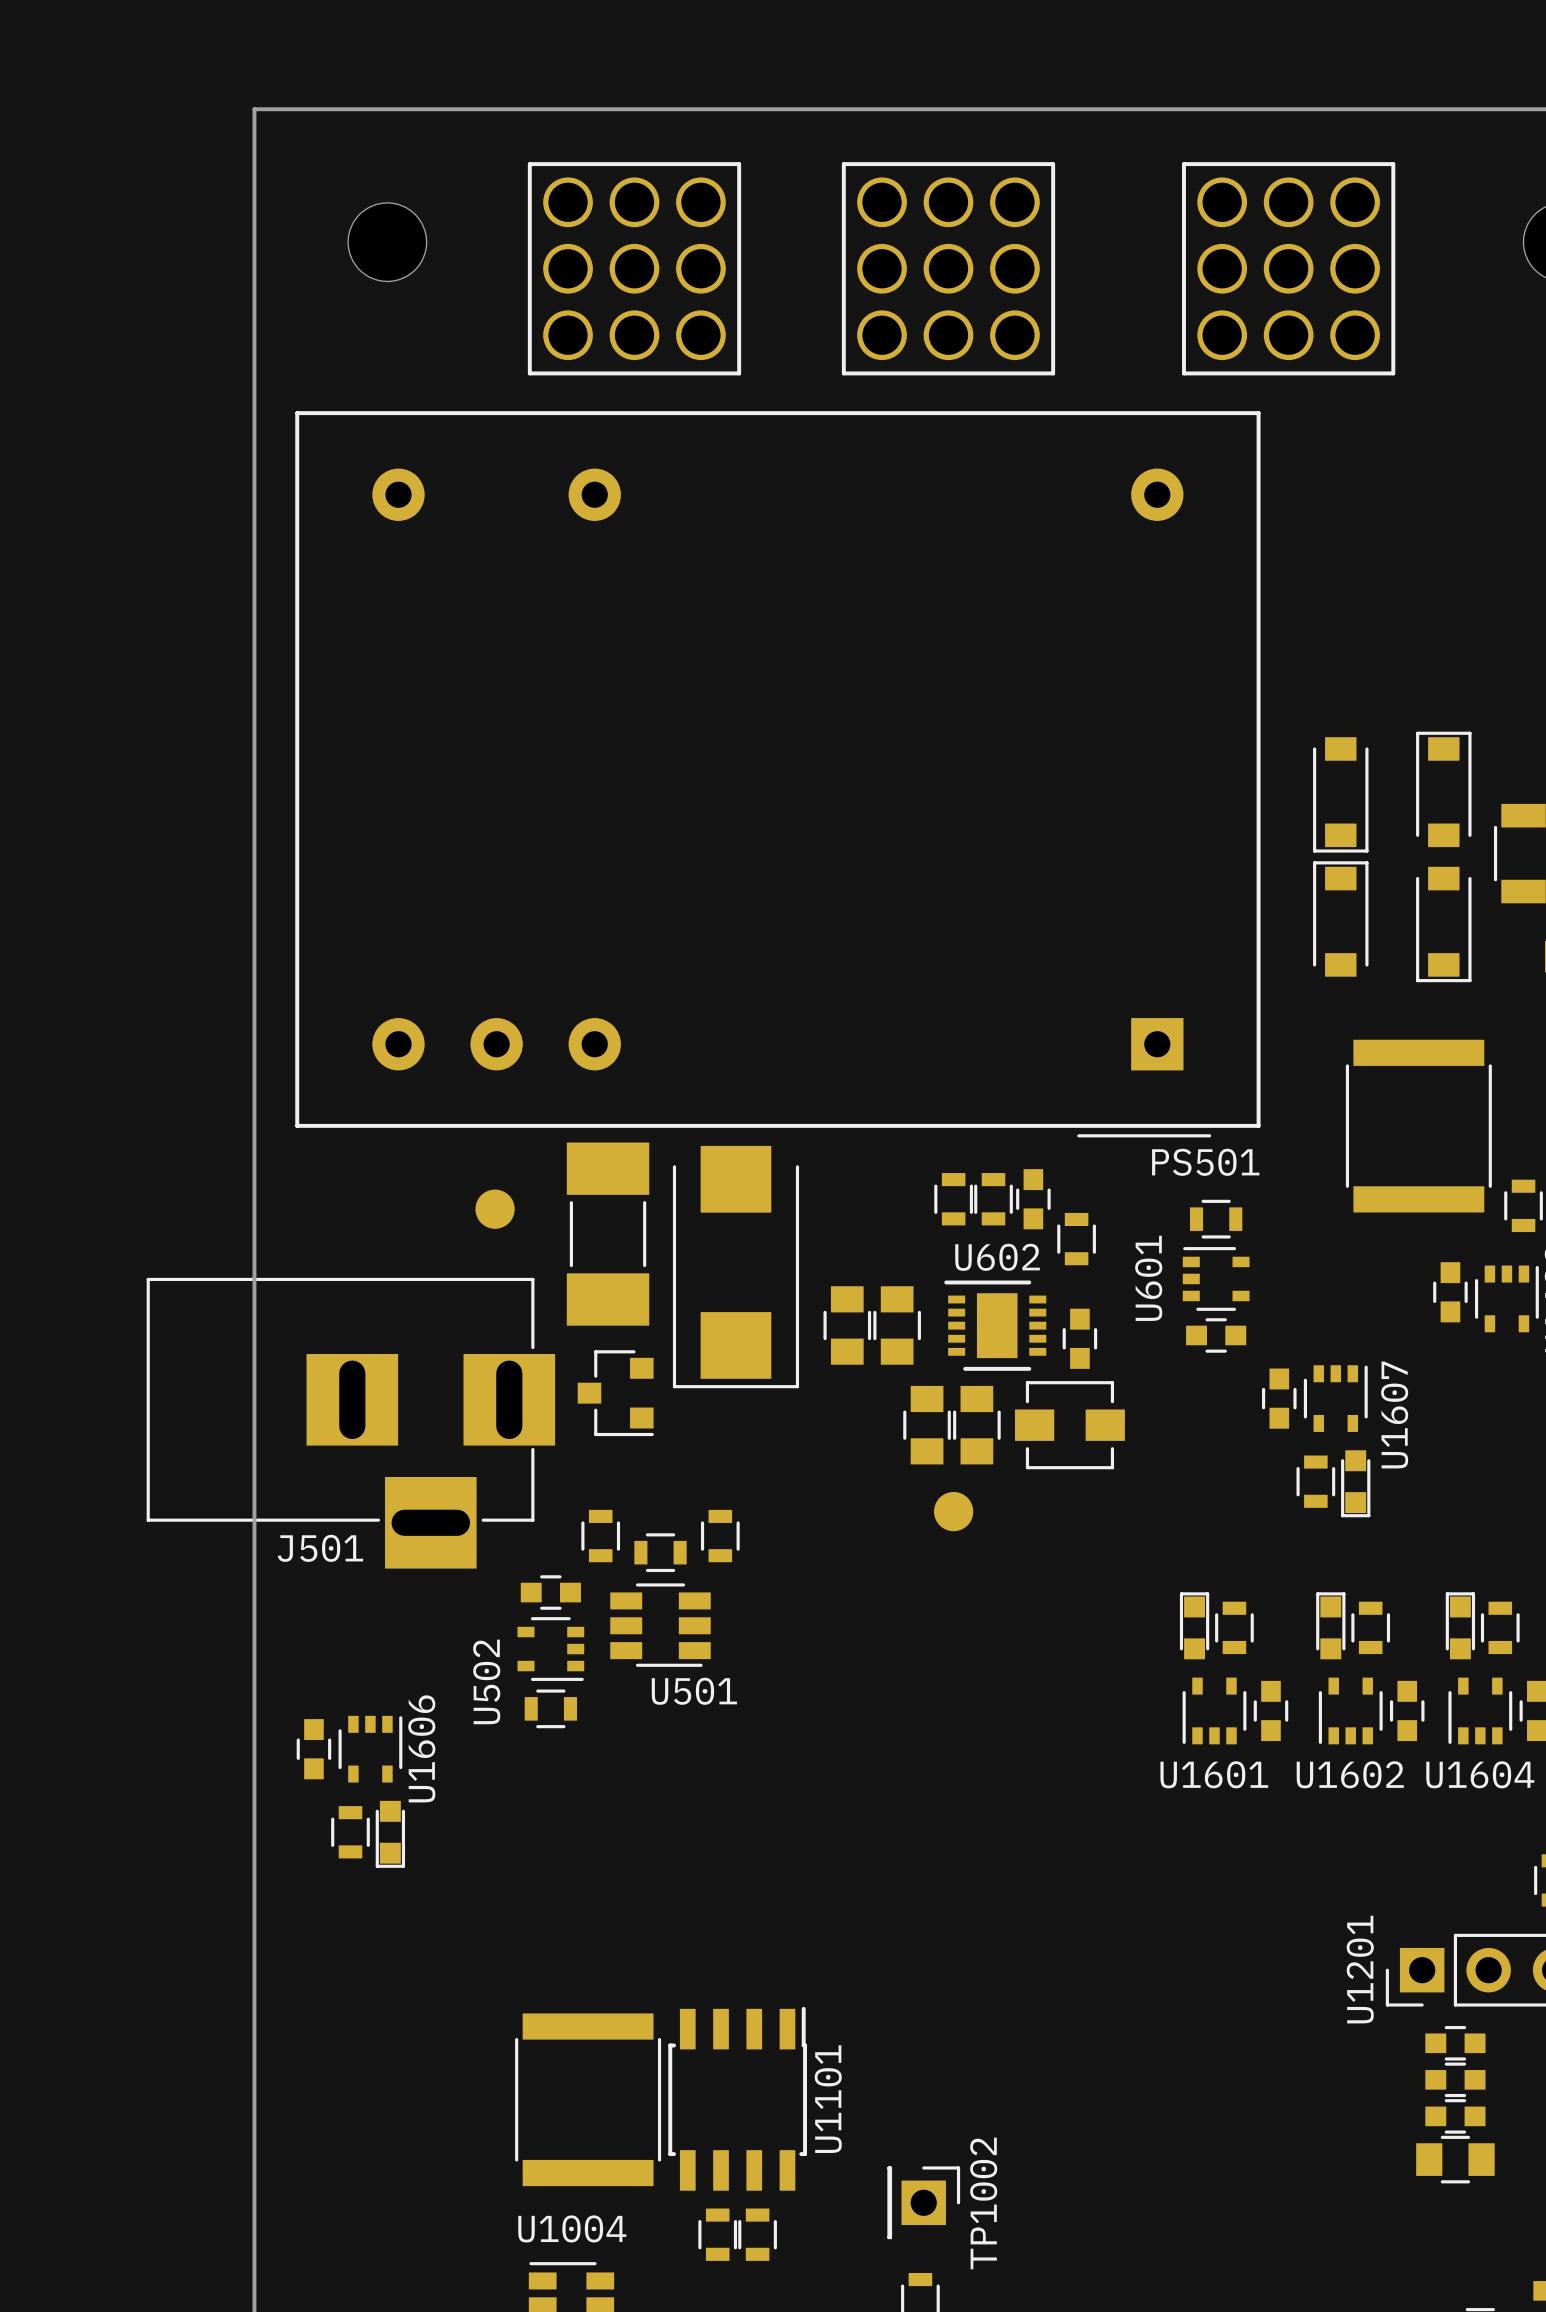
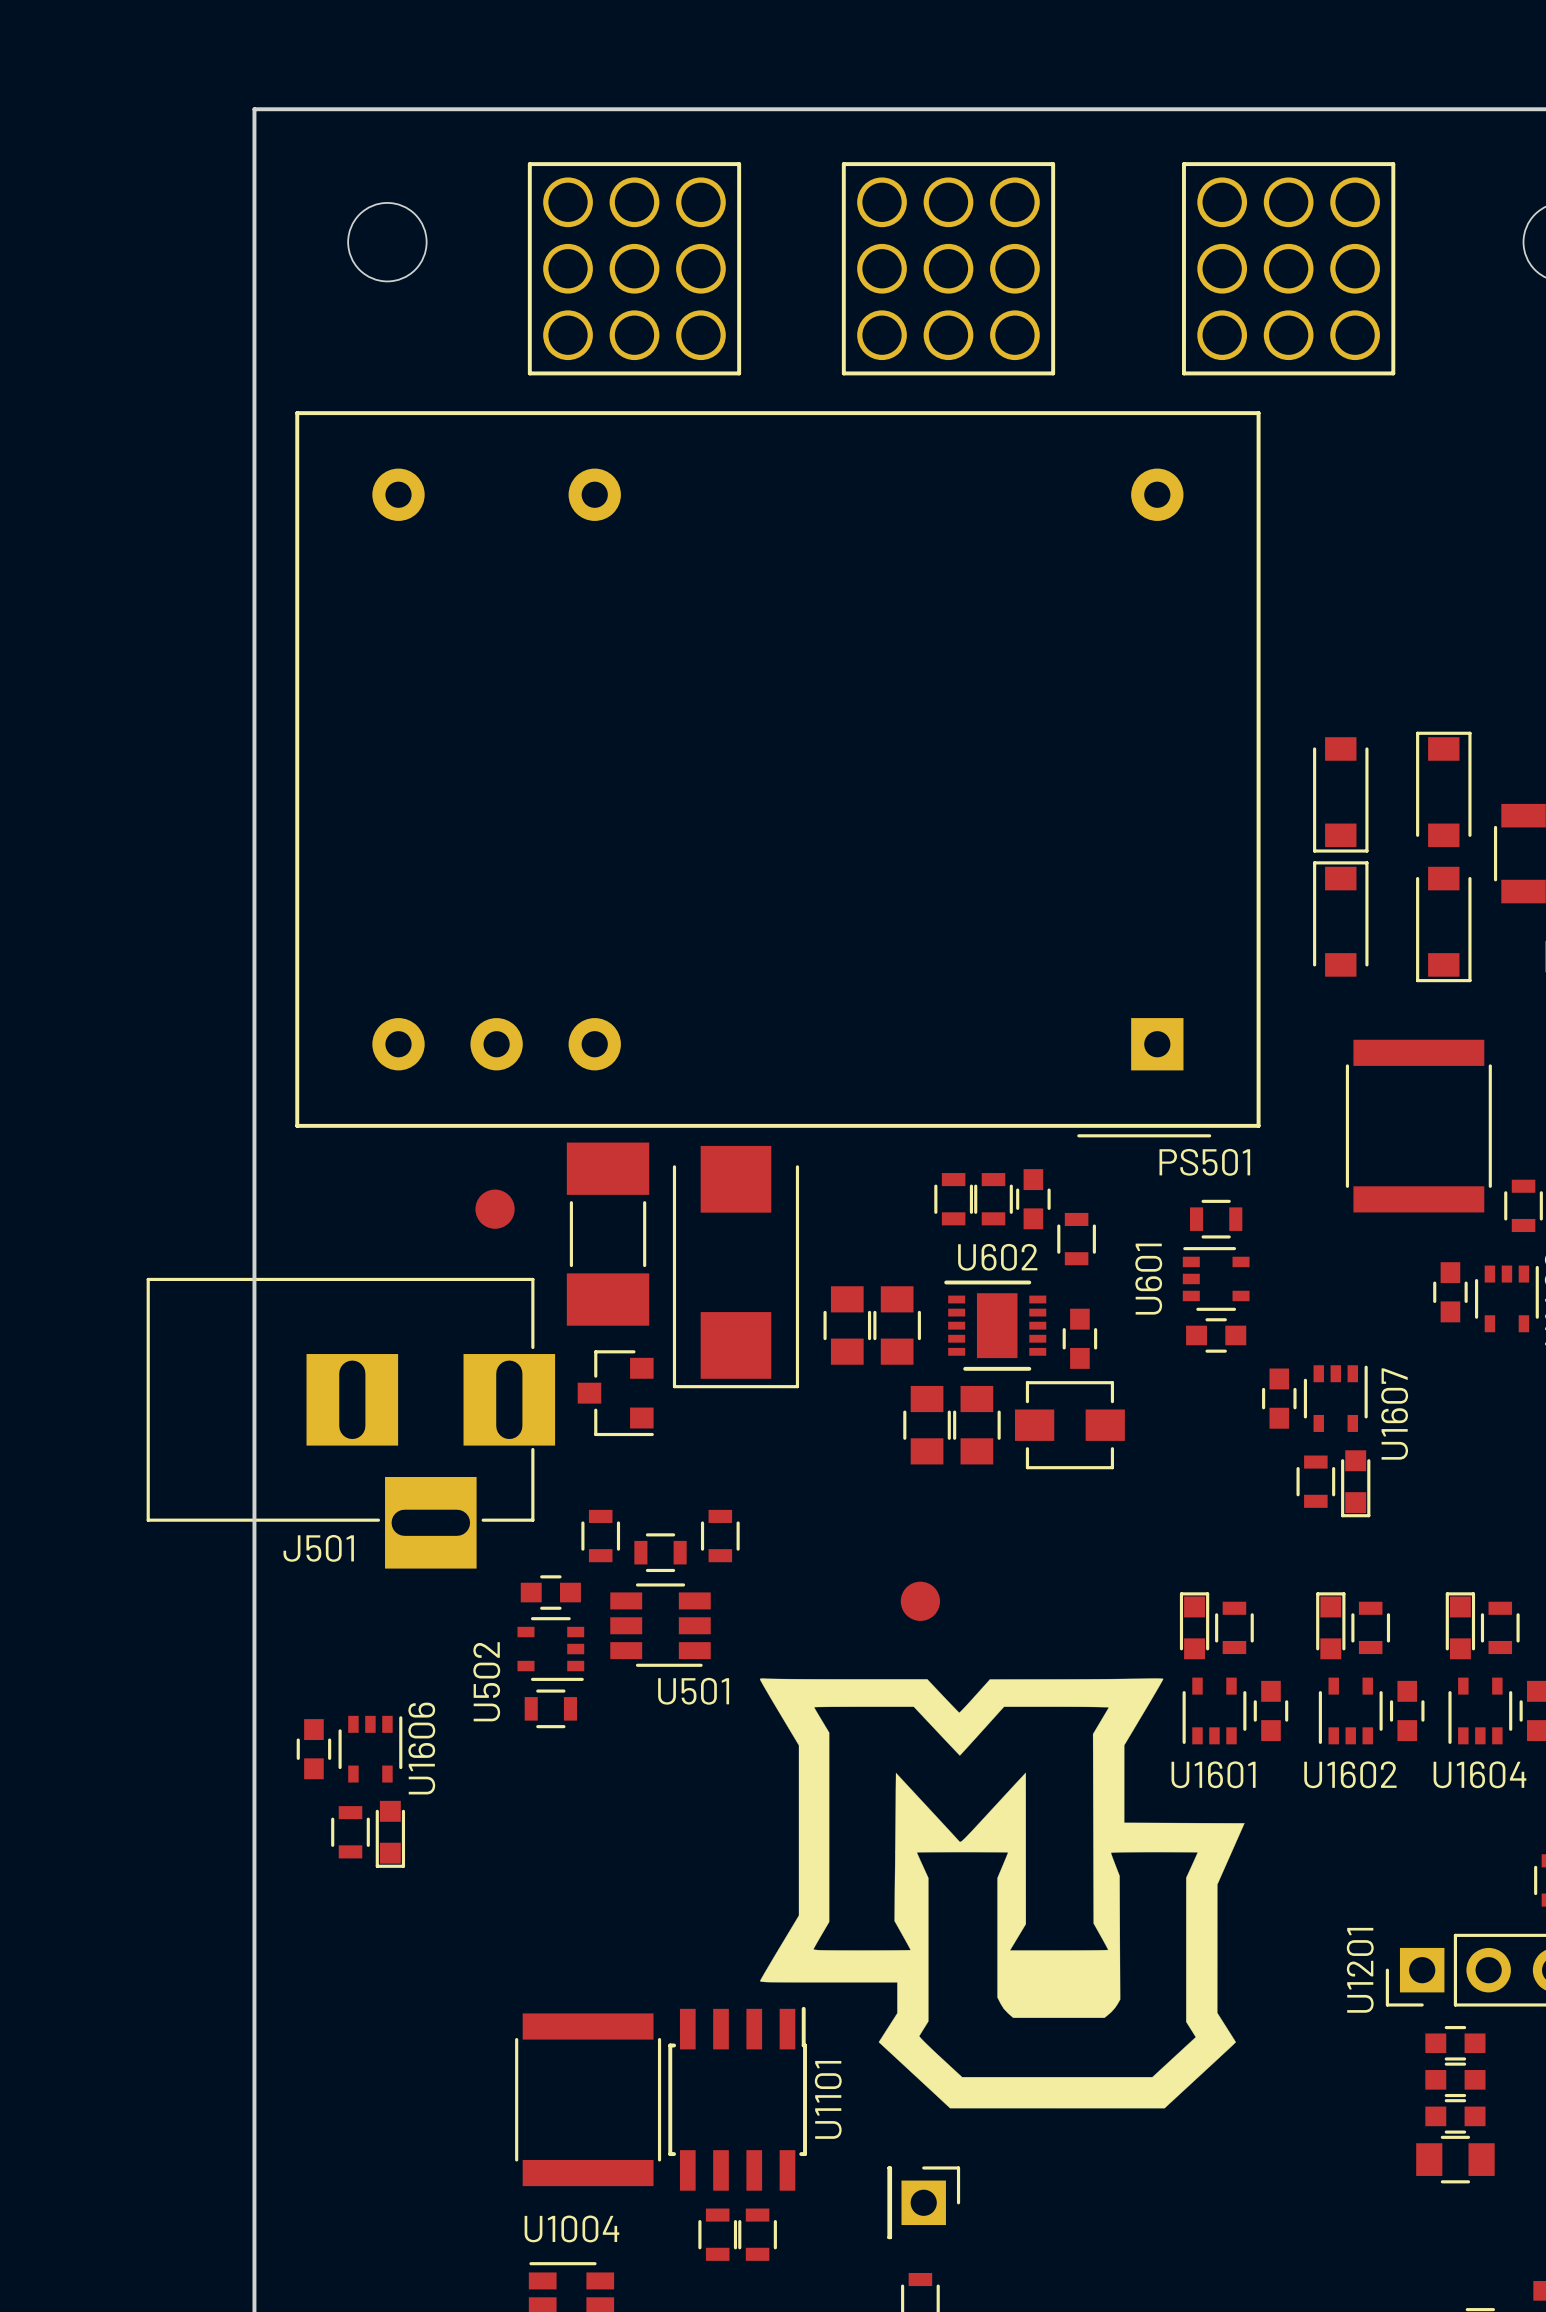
part position: (953, 1511) -> (920, 1601)
drawing: none -> [759, 1678, 1245, 2109]
TP1002 name: TP1002 (983, 2203) -> none

